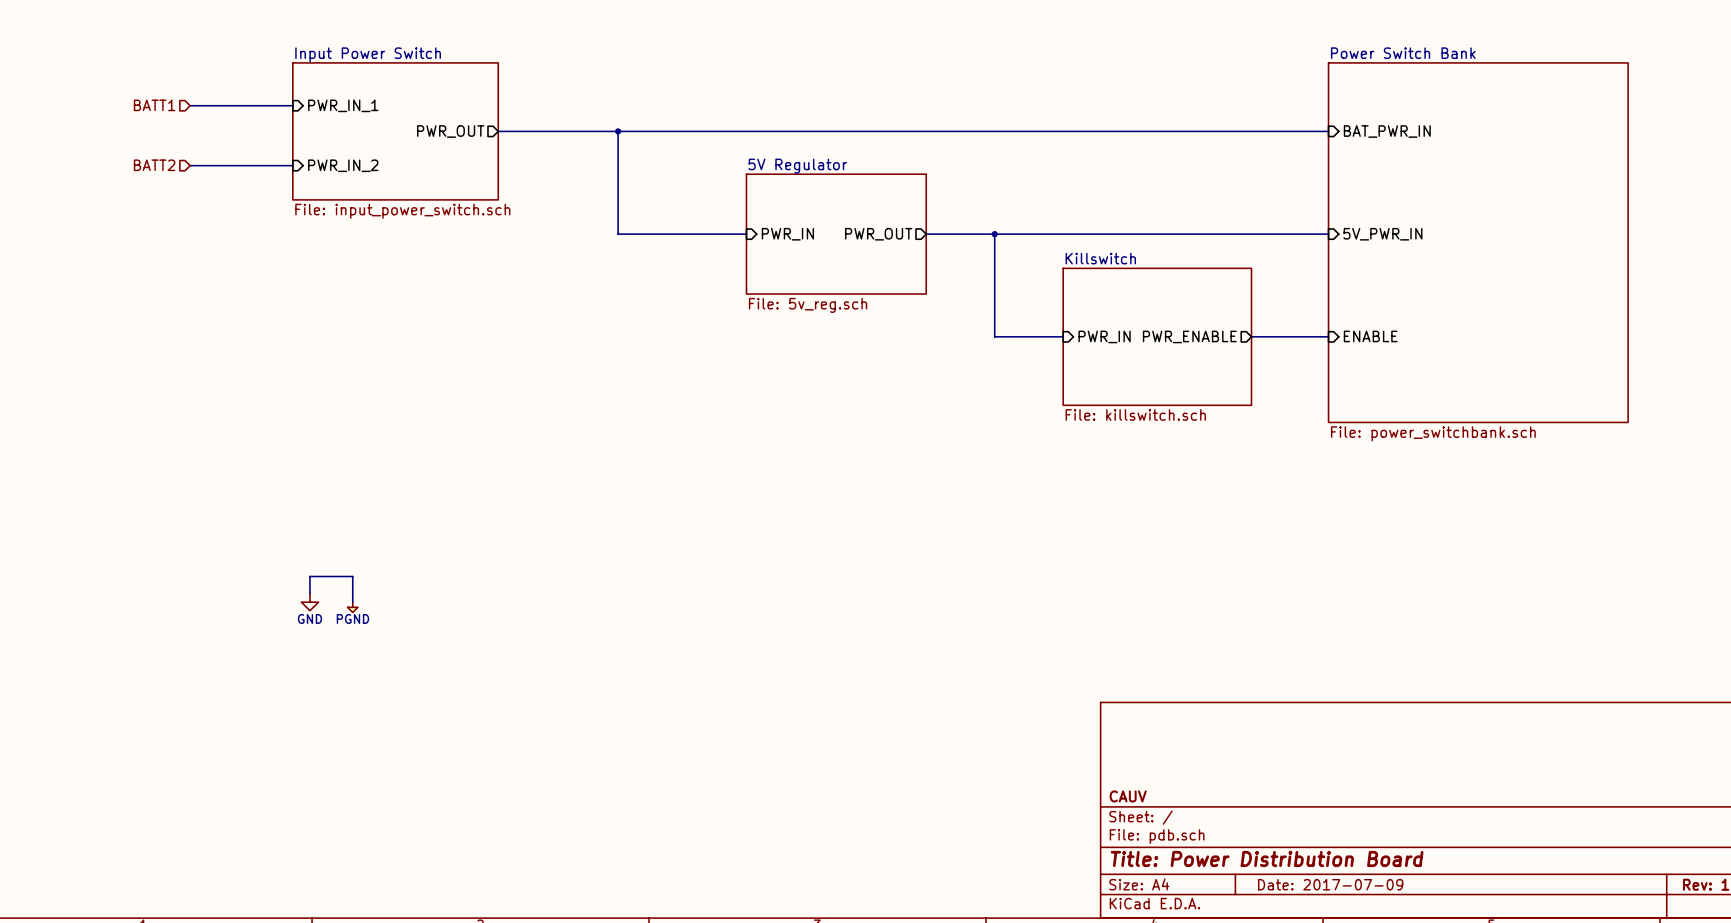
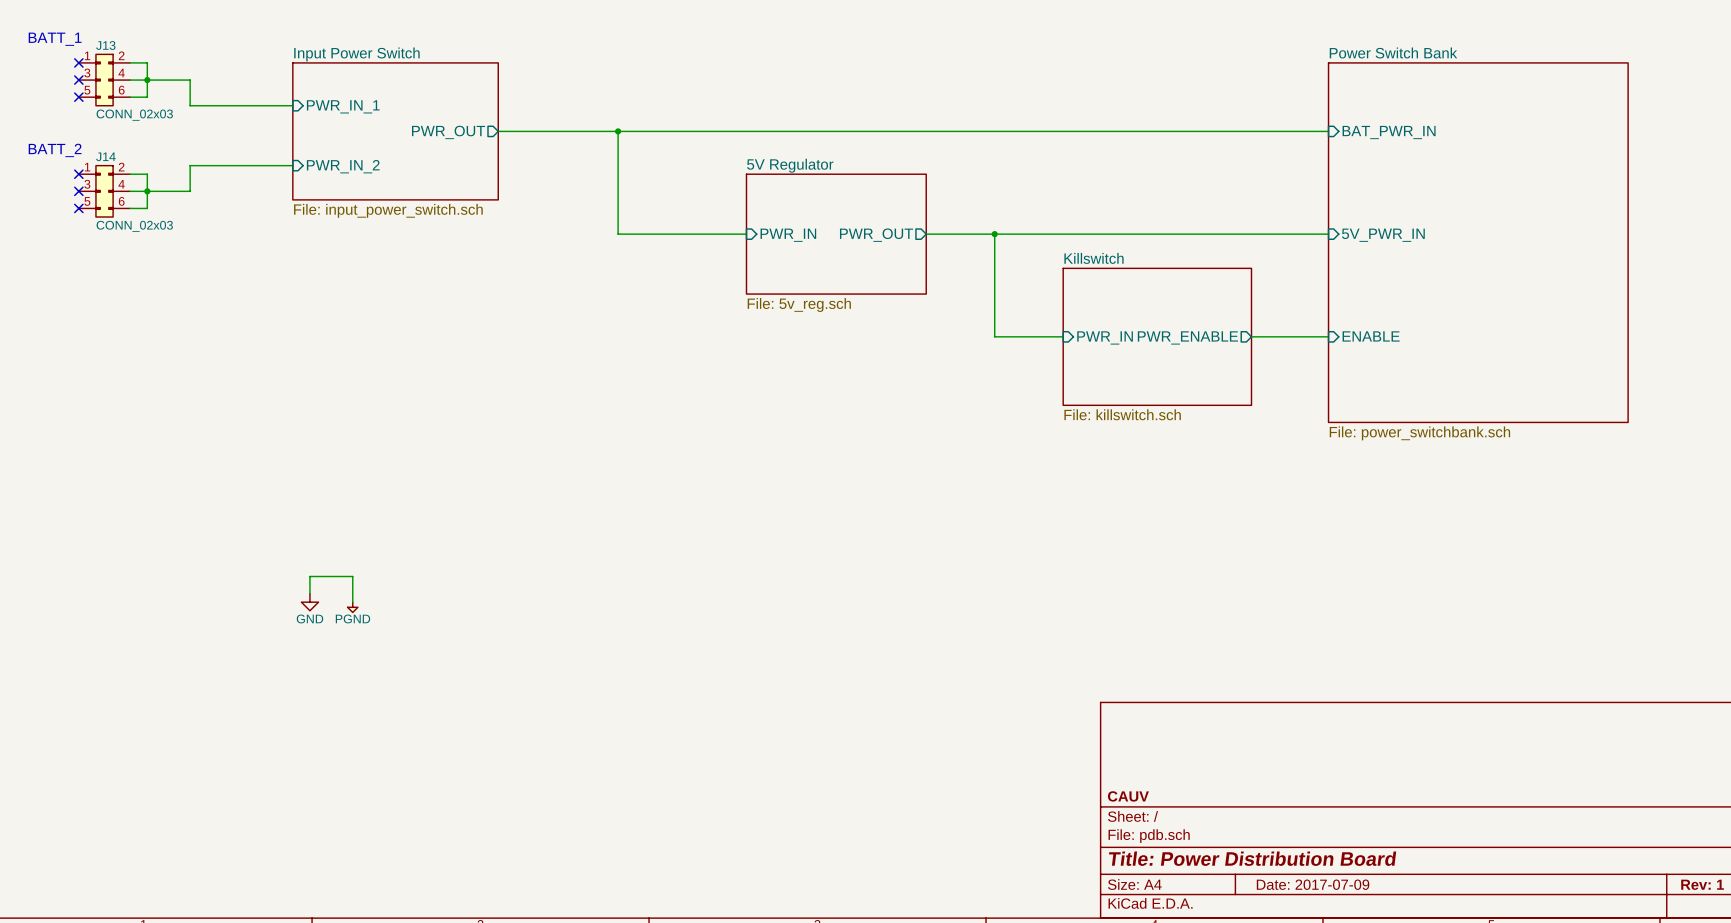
text: none -> BATT_1 (55, 39)
no-connect mark: none -> (78, 62)
wire: none -> (130, 62) (147, 62) (147, 97) (130, 97)
no-connect mark: none -> (78, 80)
J13: none -> CONN_02x03 (104, 80)
wire: none -> (130, 80) (190, 80) (190, 105)
junction: none -> (147, 80)
no-connect mark: none -> (78, 97)
hierarchical label: BATT1 (154, 105) -> none
text: none -> BATT_2 (55, 150)
hierarchical label: BATT2 (154, 165) -> none
wire: none -> (190, 165) (190, 191) (130, 191)
no-connect mark: none -> (78, 174)
wire: none -> (130, 174) (147, 174) (147, 208) (130, 208)
no-connect mark: none -> (78, 191)
J14: none -> CONN_02x03 (104, 191)
junction: none -> (147, 191)
no-connect mark: none -> (78, 208)

